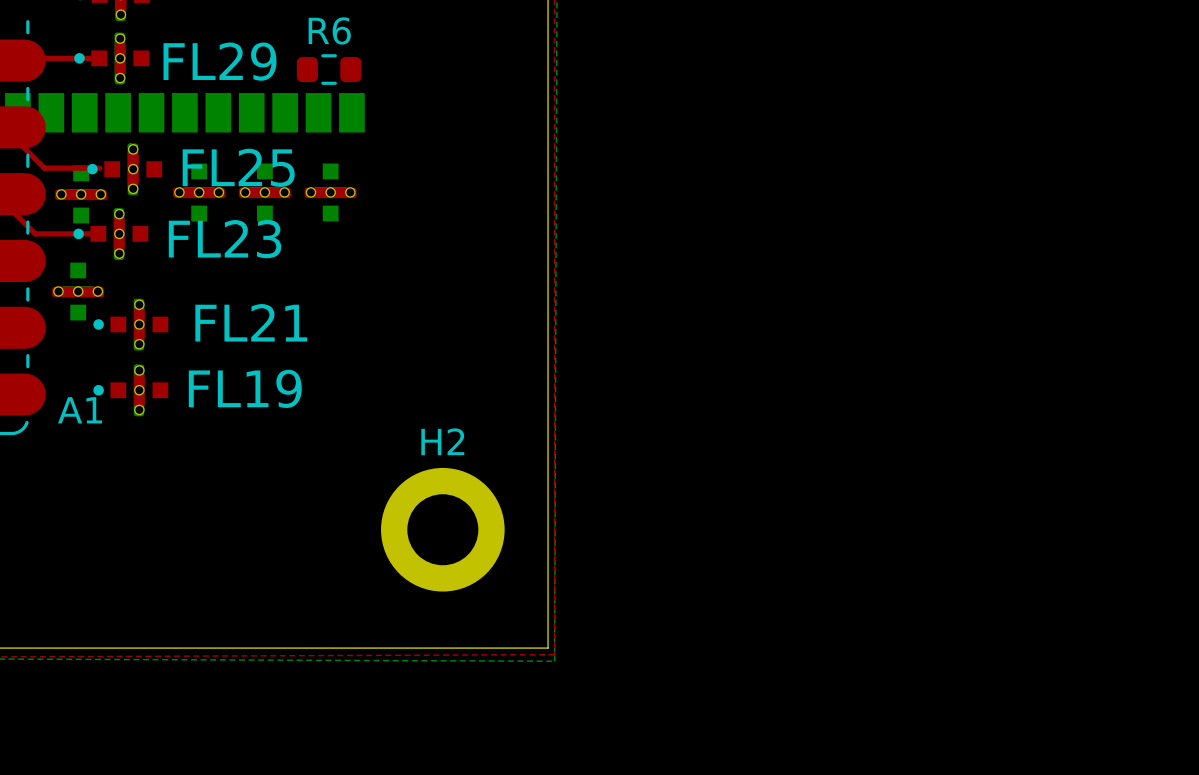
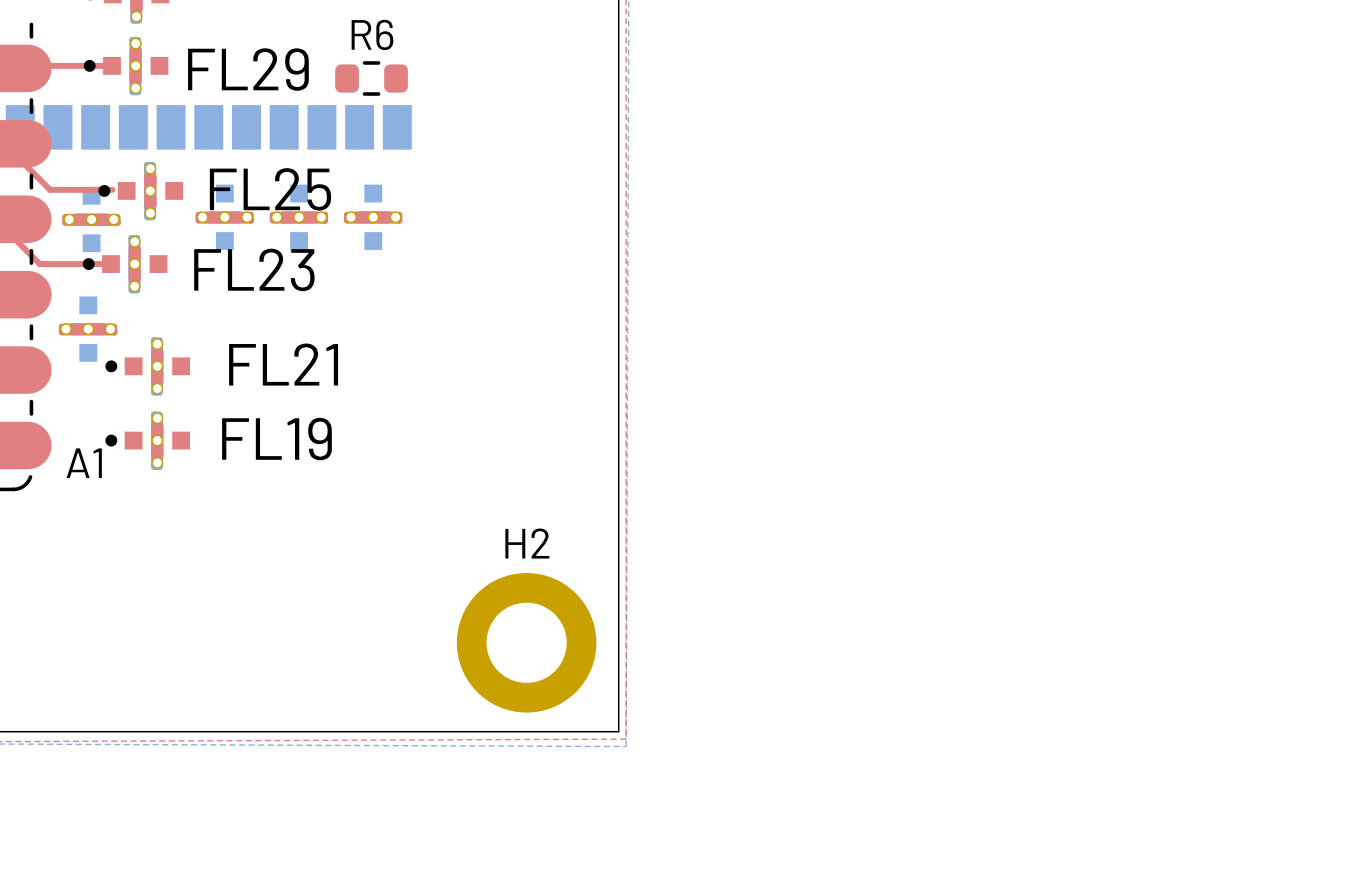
H2 position: (442, 529) -> (526, 642)

